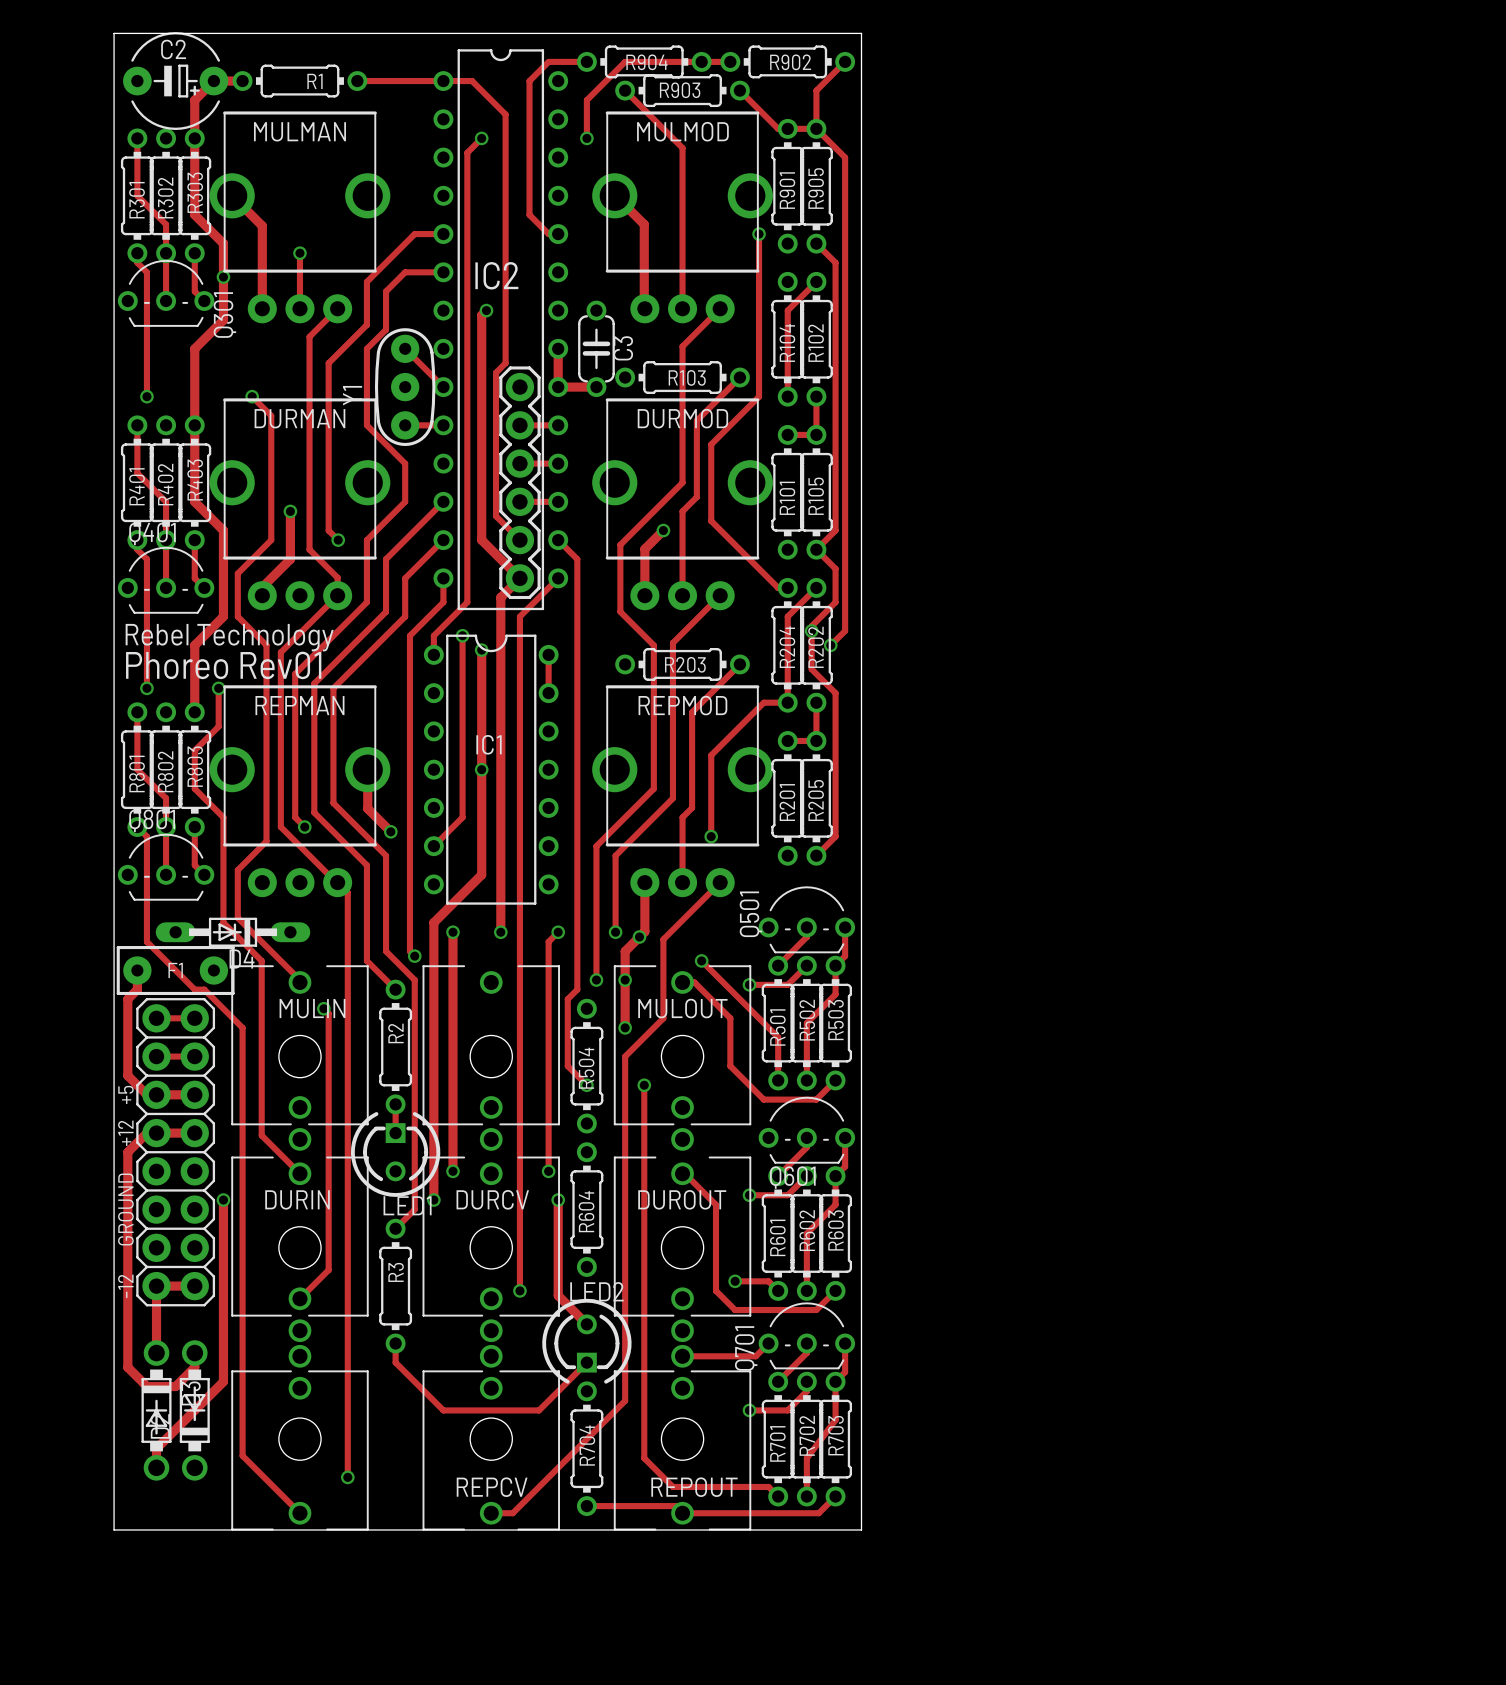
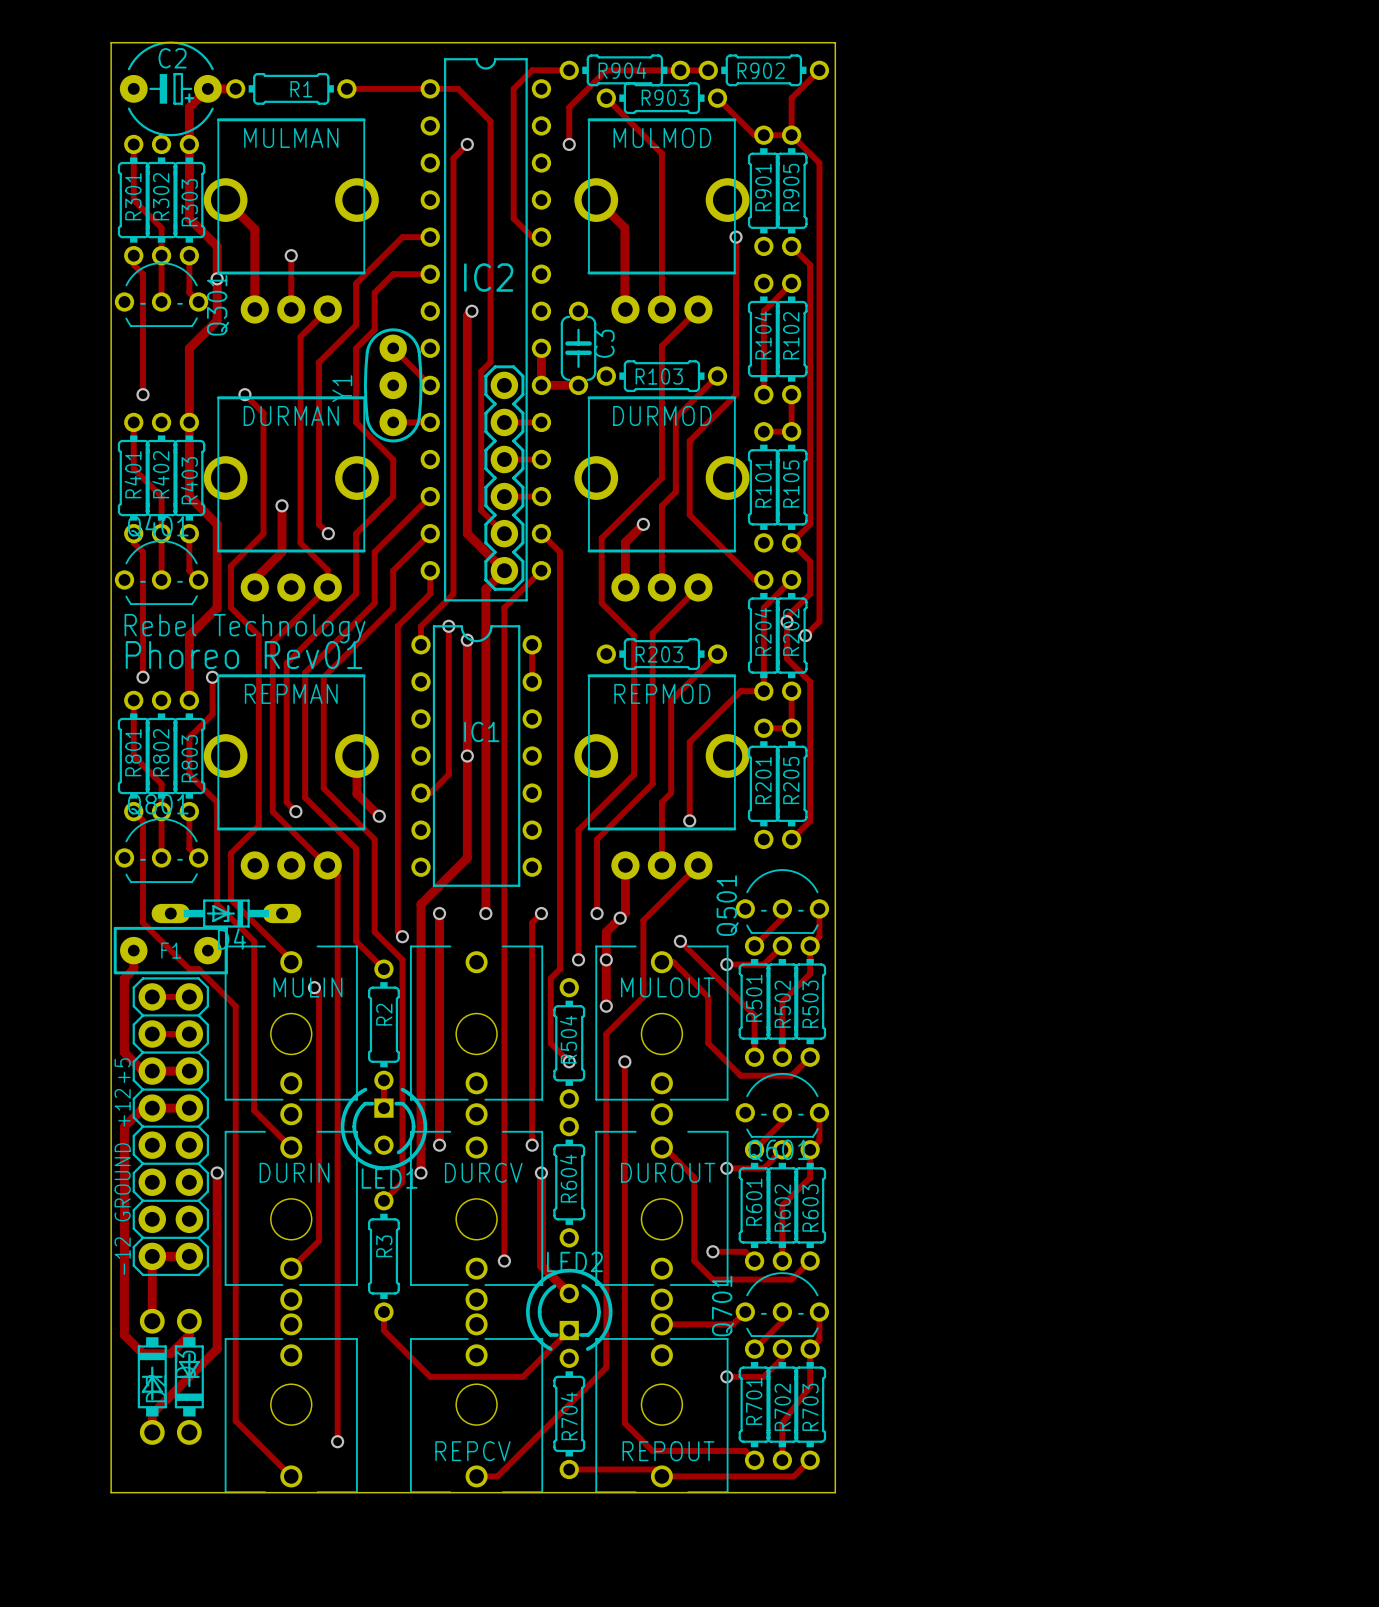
track: (462, 788) (462, 817) (433, 846) -> (448, 774) (430, 793) (421, 793)

